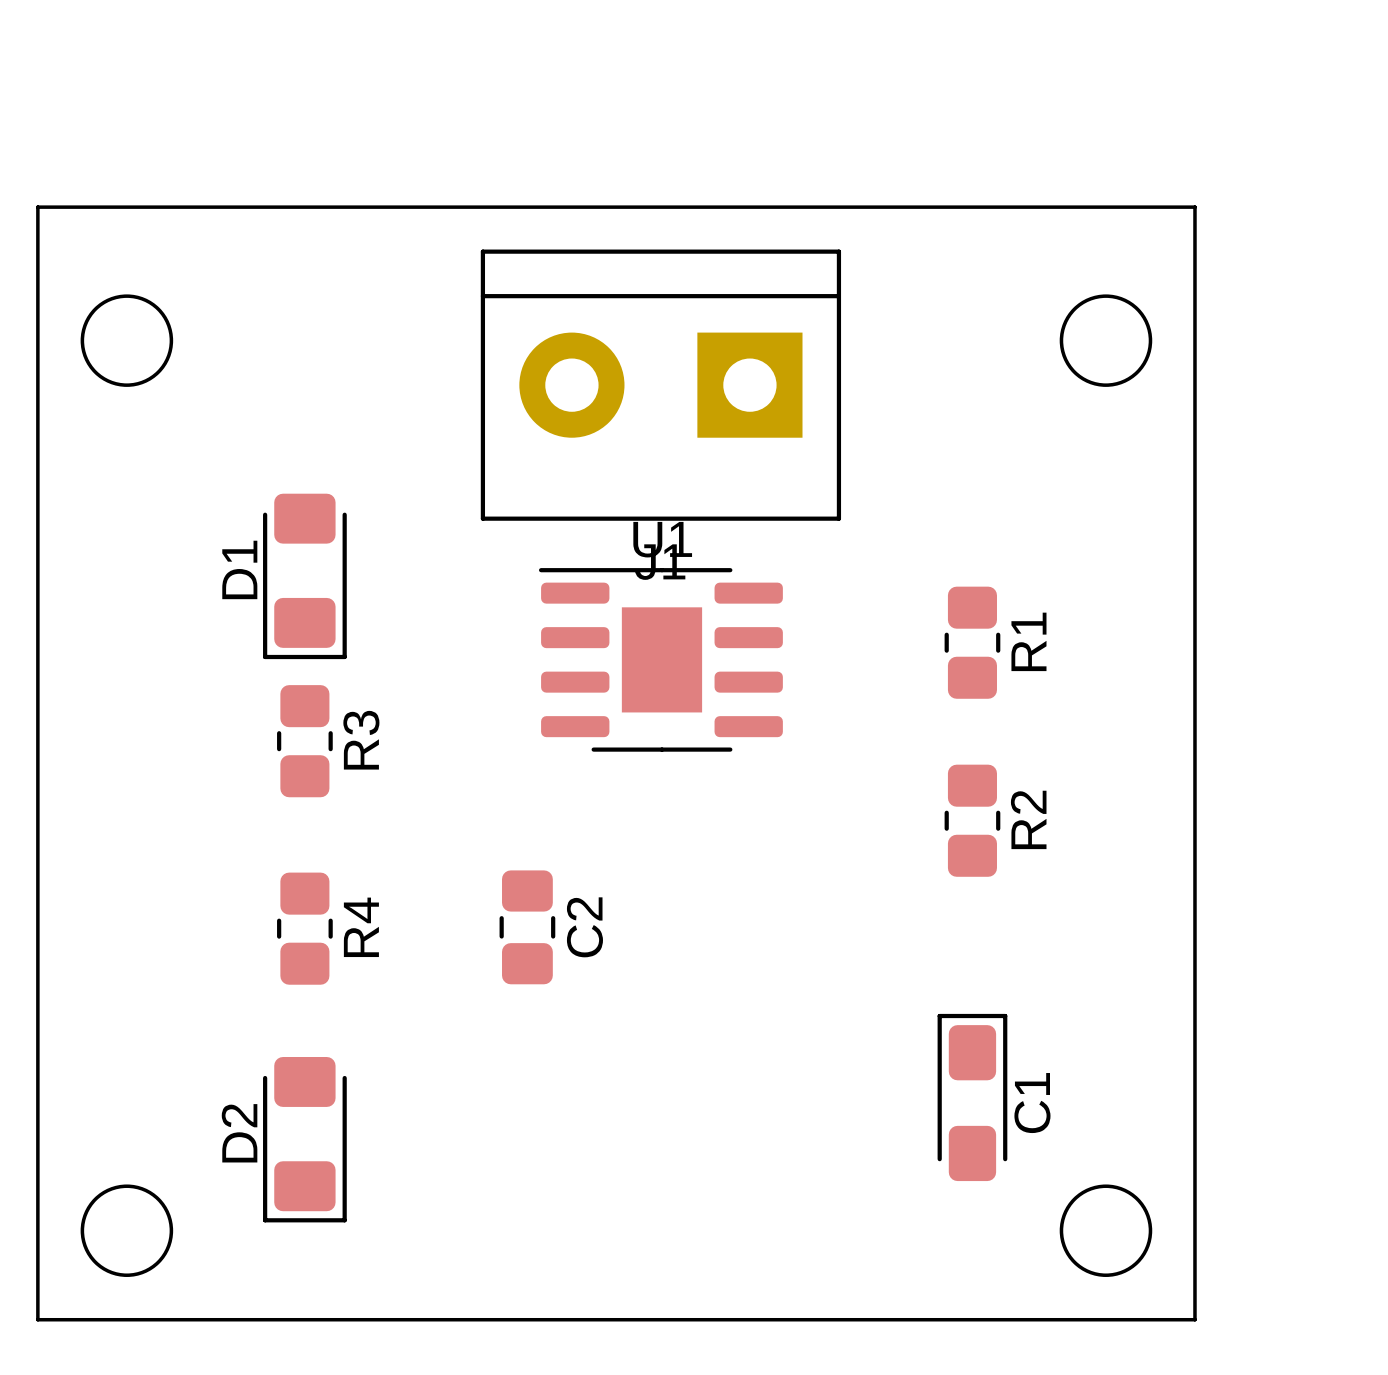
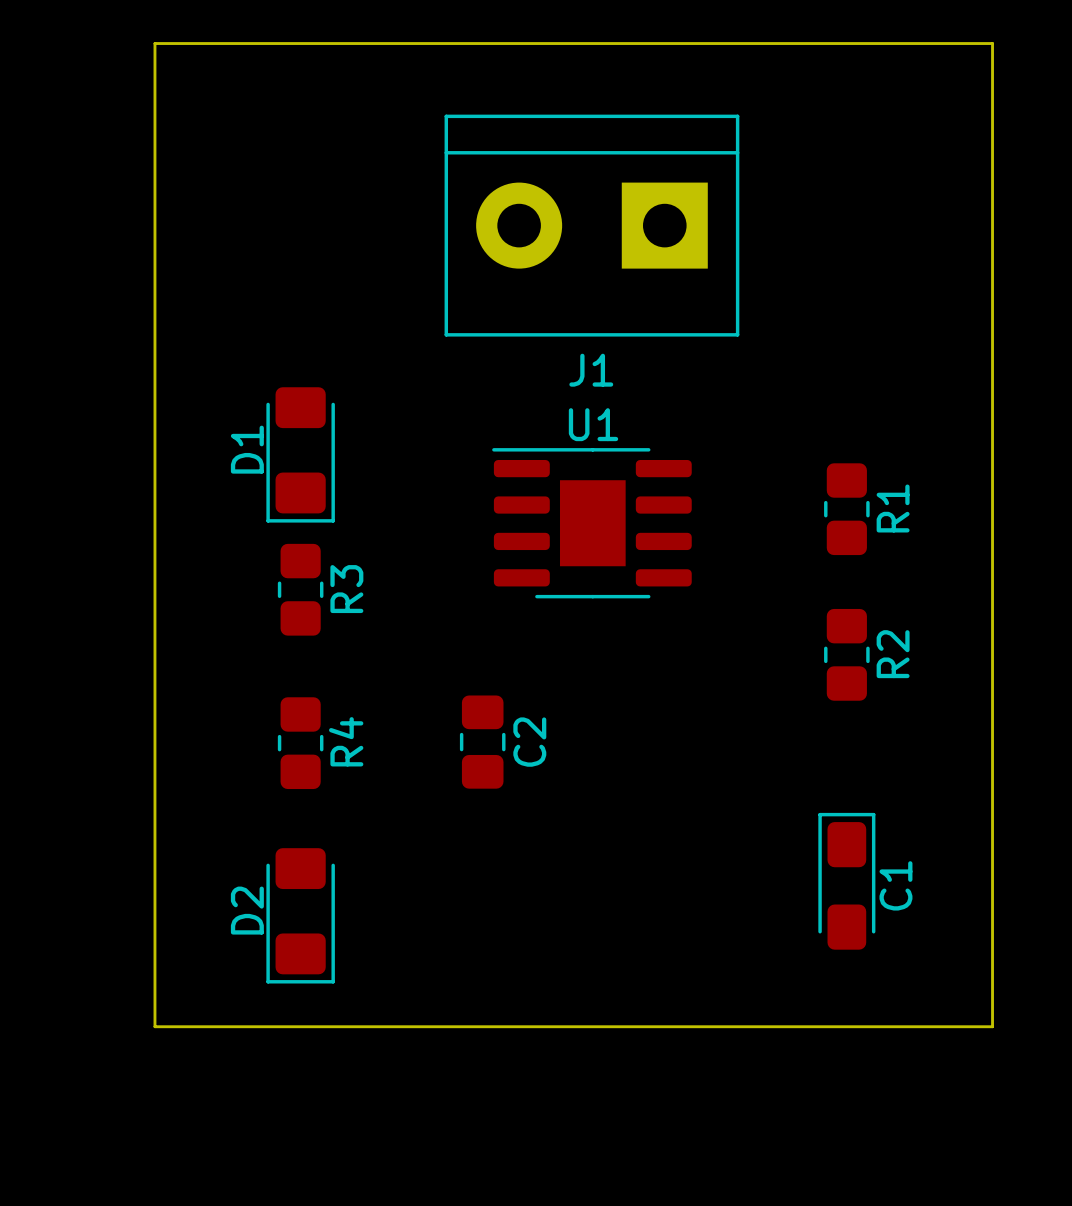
board edge: (37, 207) (1194, 207) (1194, 1319) (37, 1319) (37, 207) -> (154, 43) (154, 1026) (992, 1026) (992, 43) (154, 43)
round board edge: [80, 294, 174, 387] -> none
round board edge: [1059, 294, 1153, 387] -> none
J1 position: (660, 385) -> (591, 225)
round board edge: [80, 1184, 174, 1277] -> none
round board edge: [1059, 1184, 1153, 1277] -> none

